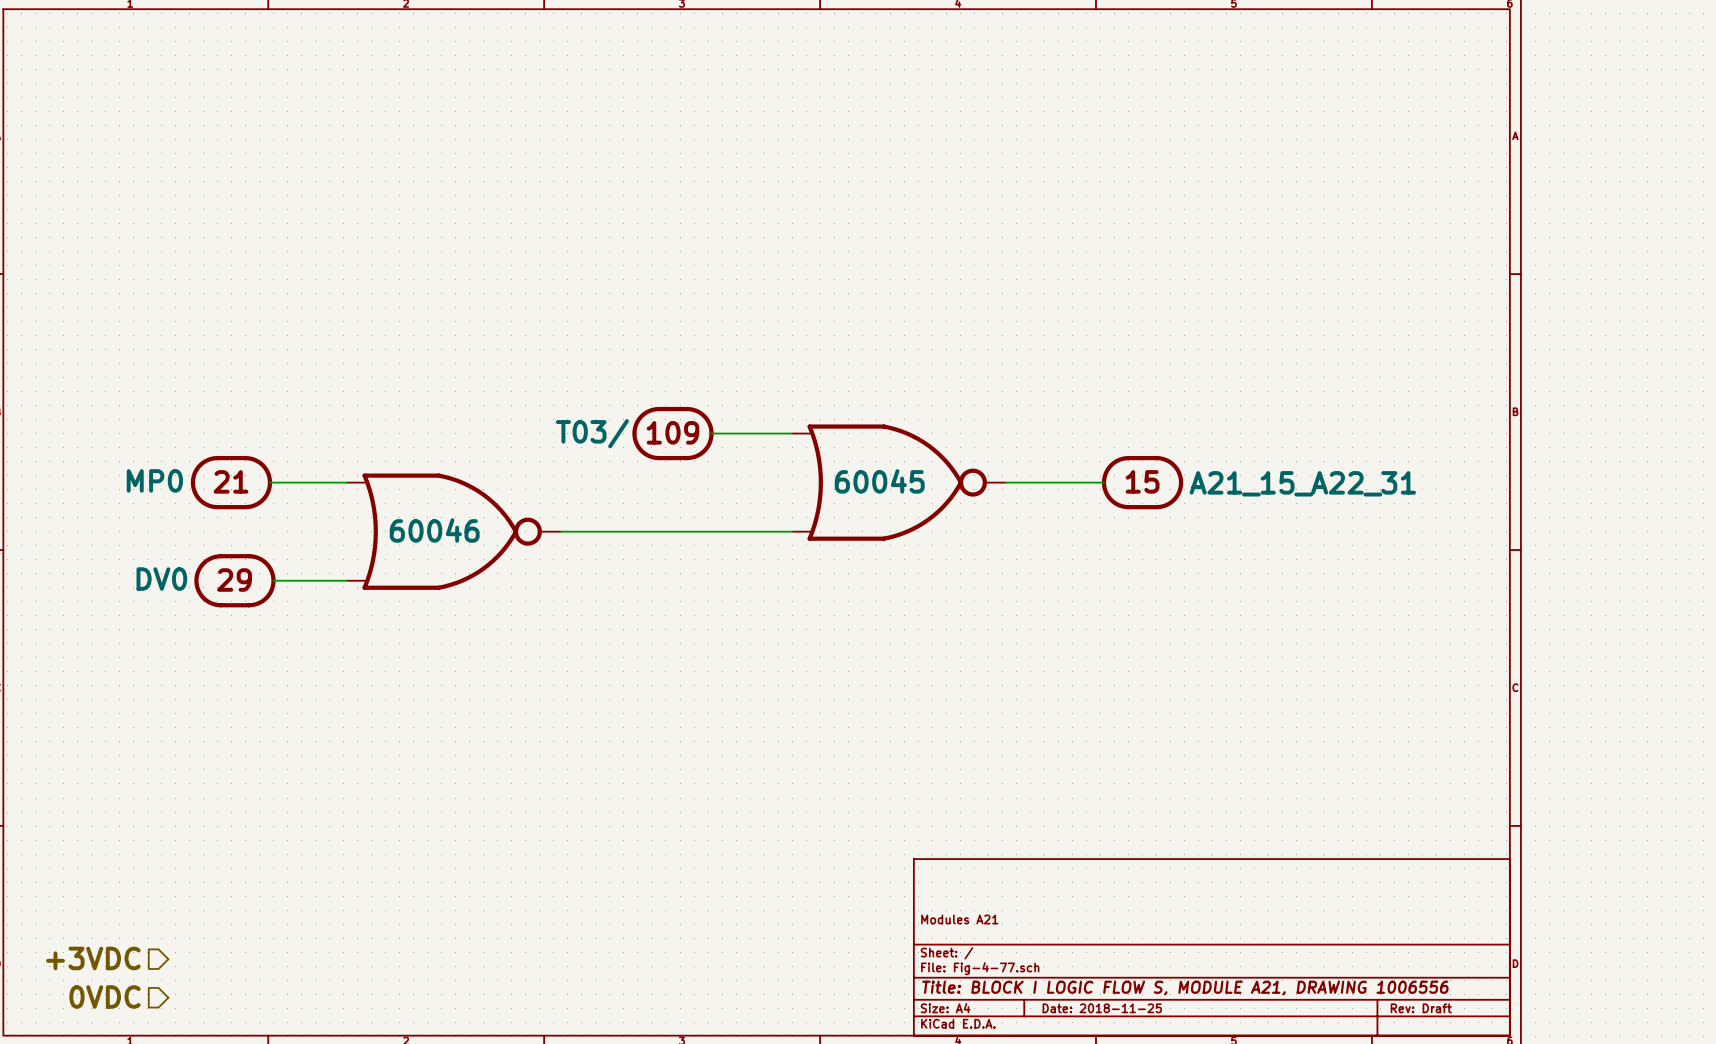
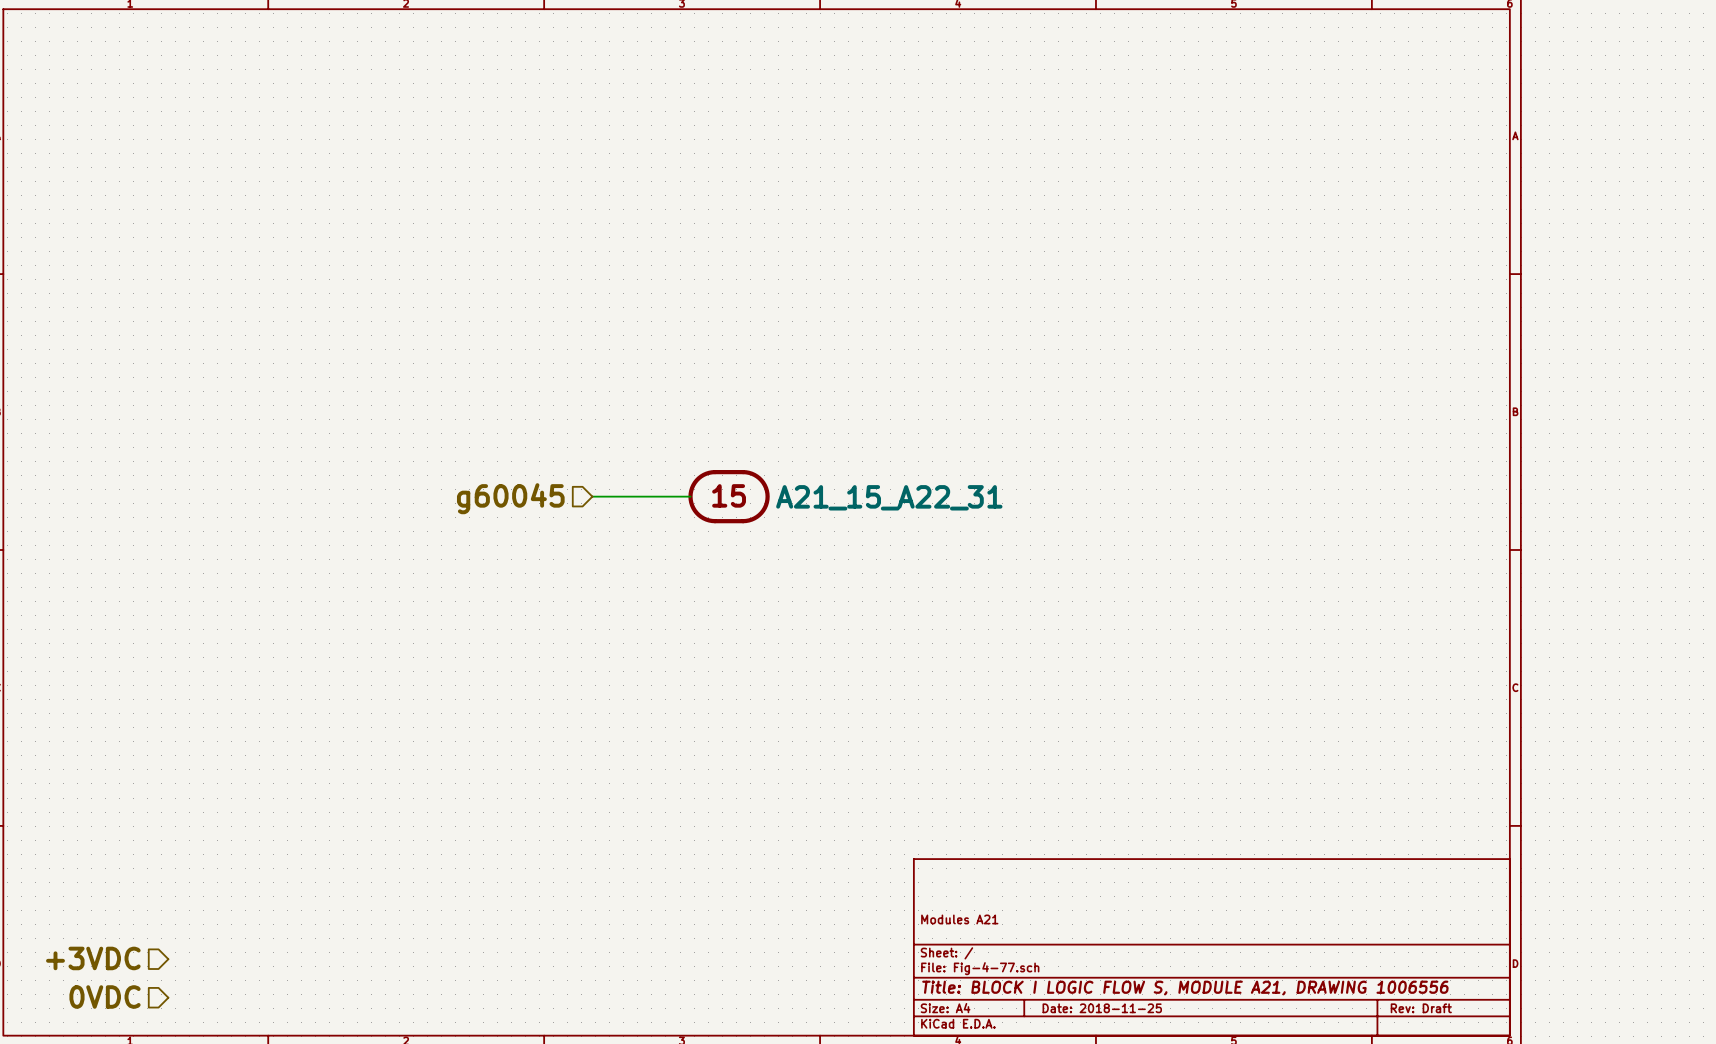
part: (672, 433) -> none
wire: (711, 433) (792, 433) -> none
part: (231, 482) -> none
wire: (270, 482) (347, 482) -> none
part: (899, 482) -> none
wire: (1005, 482) (1104, 482) -> none
part: (1142, 482) -> none
wire: none -> (592, 496) (690, 496)
part: none -> (729, 496)
hierarchical label: none -> g60045 (510, 498)
part: (453, 531) -> none
wire: (560, 531) (792, 531) -> none
part: (234, 580) -> none
wire: (273, 580) (347, 580) -> none

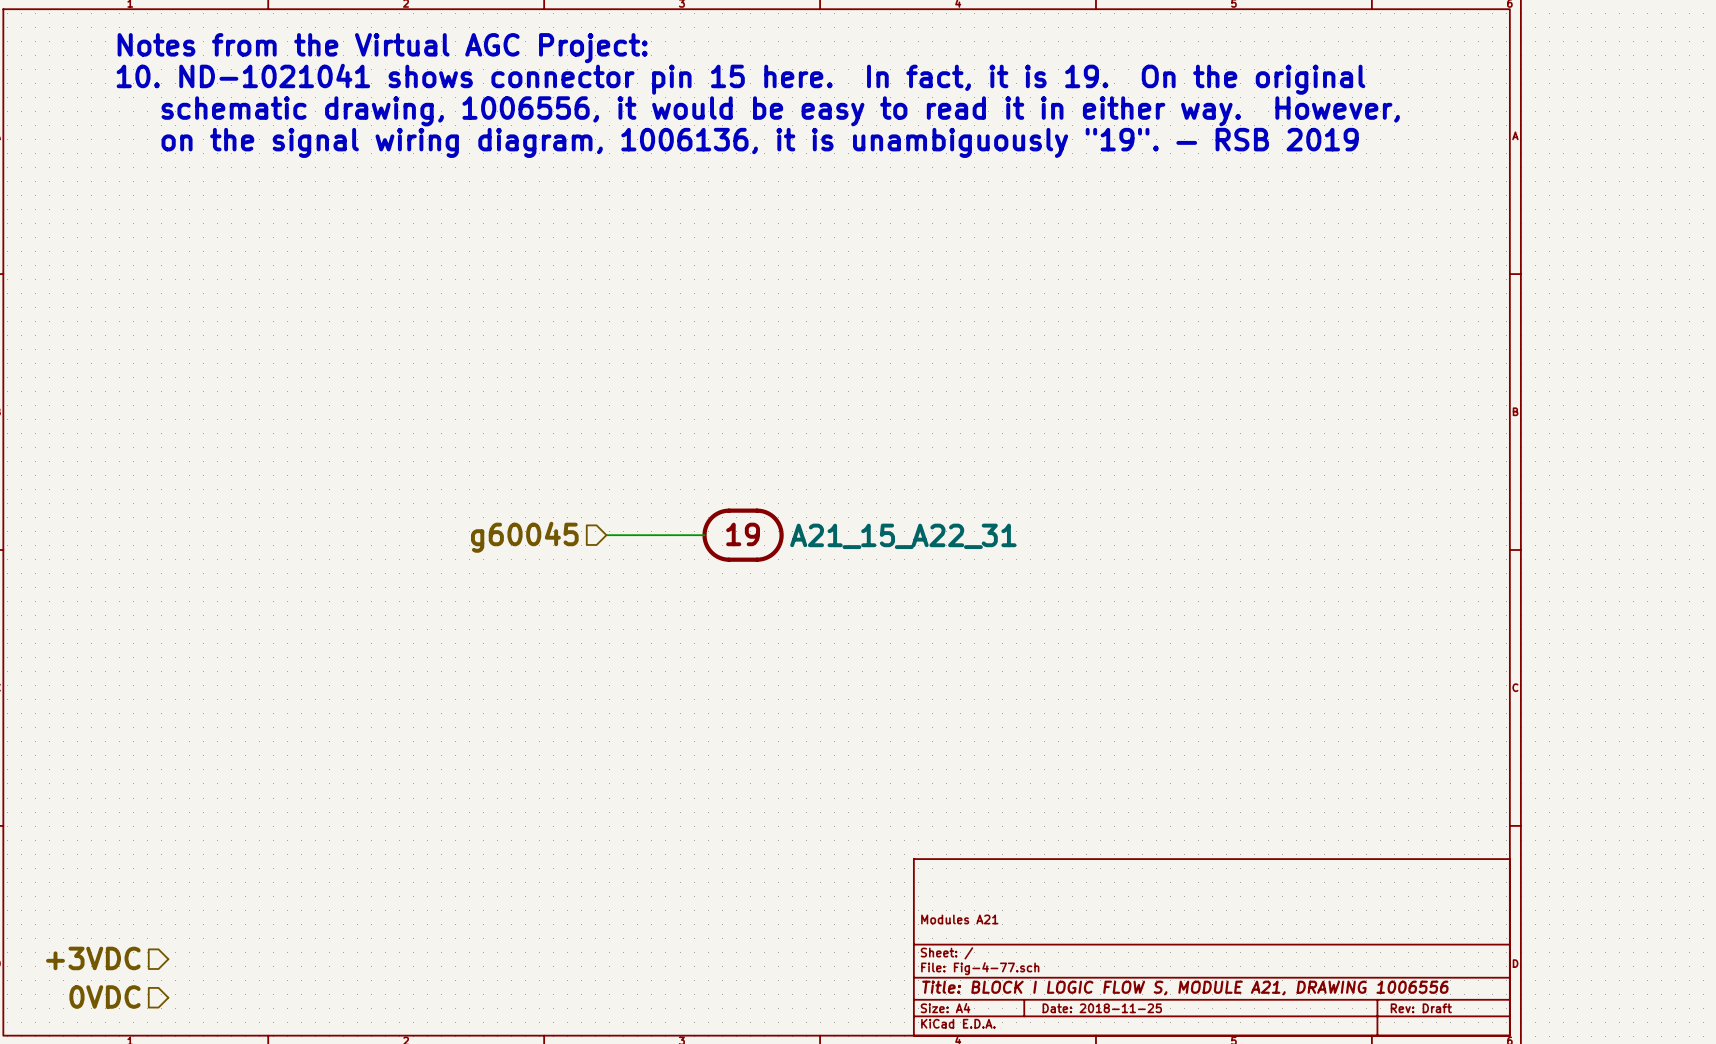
text: none -> Notes from the Virtual AGC Project: (382, 48)
text: none -> 10. ND-1021041 shows connector pin 15 here. In fact, it is 19. On the original (740, 79)
text: none -> schematic drawing, 1006556, it would be easy to read it in either way. However, (780, 111)
text: none -> on the signal wiring diagram, 1006136, it is unambiguously "19". — RSB 2019 (760, 142)
wire: (592, 496) (690, 496) -> (606, 535) (704, 535)
part: (729, 496) -> none
hierarchical label position: g60045 (510, 498) -> g60045 (524, 537)
part: none -> (743, 535)

